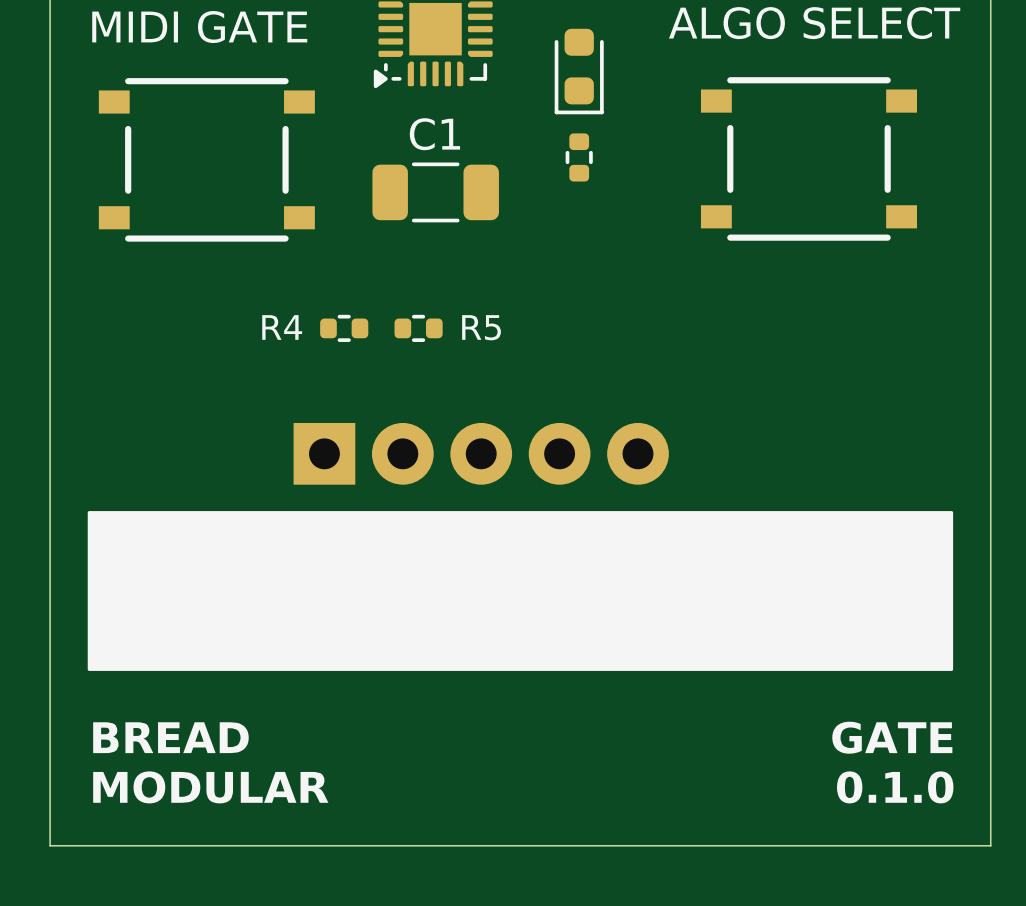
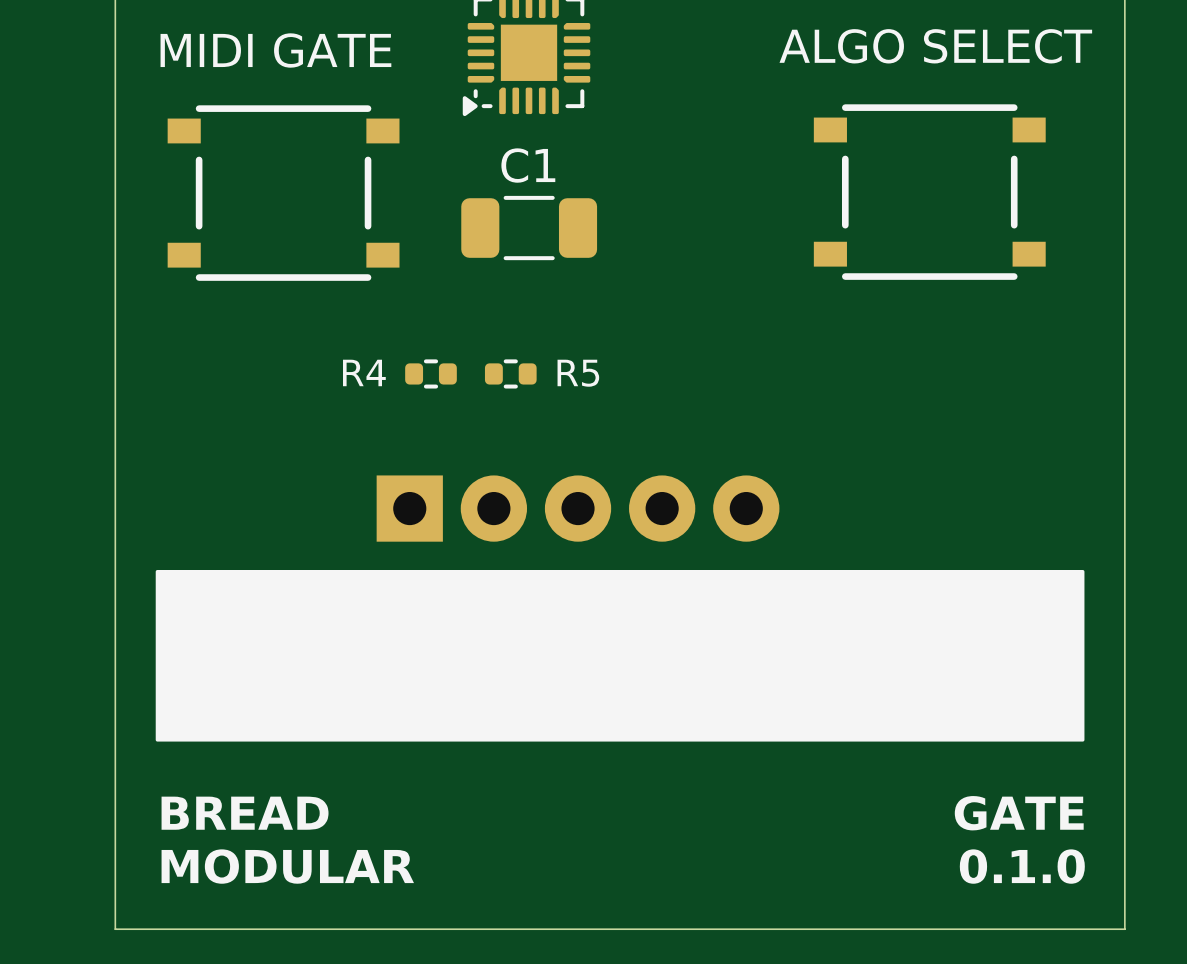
part: (579, 71) -> none
part: (579, 157) -> none

